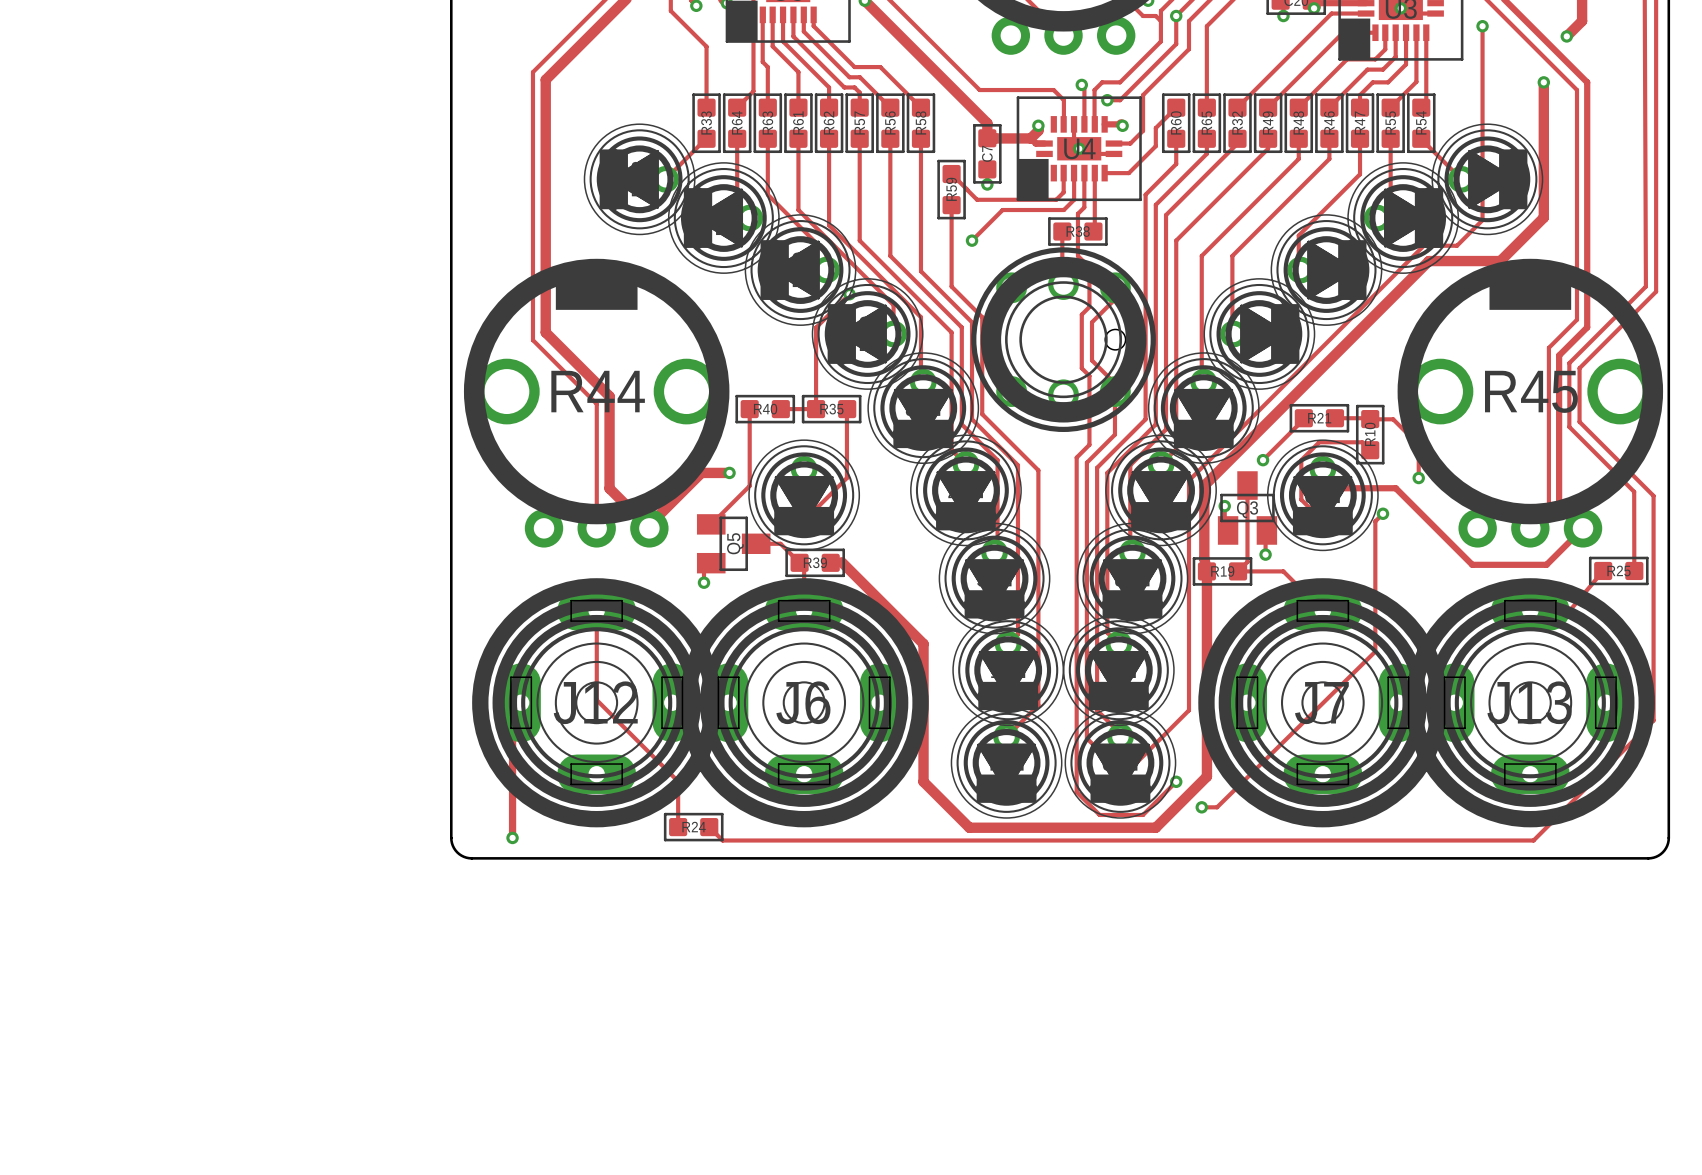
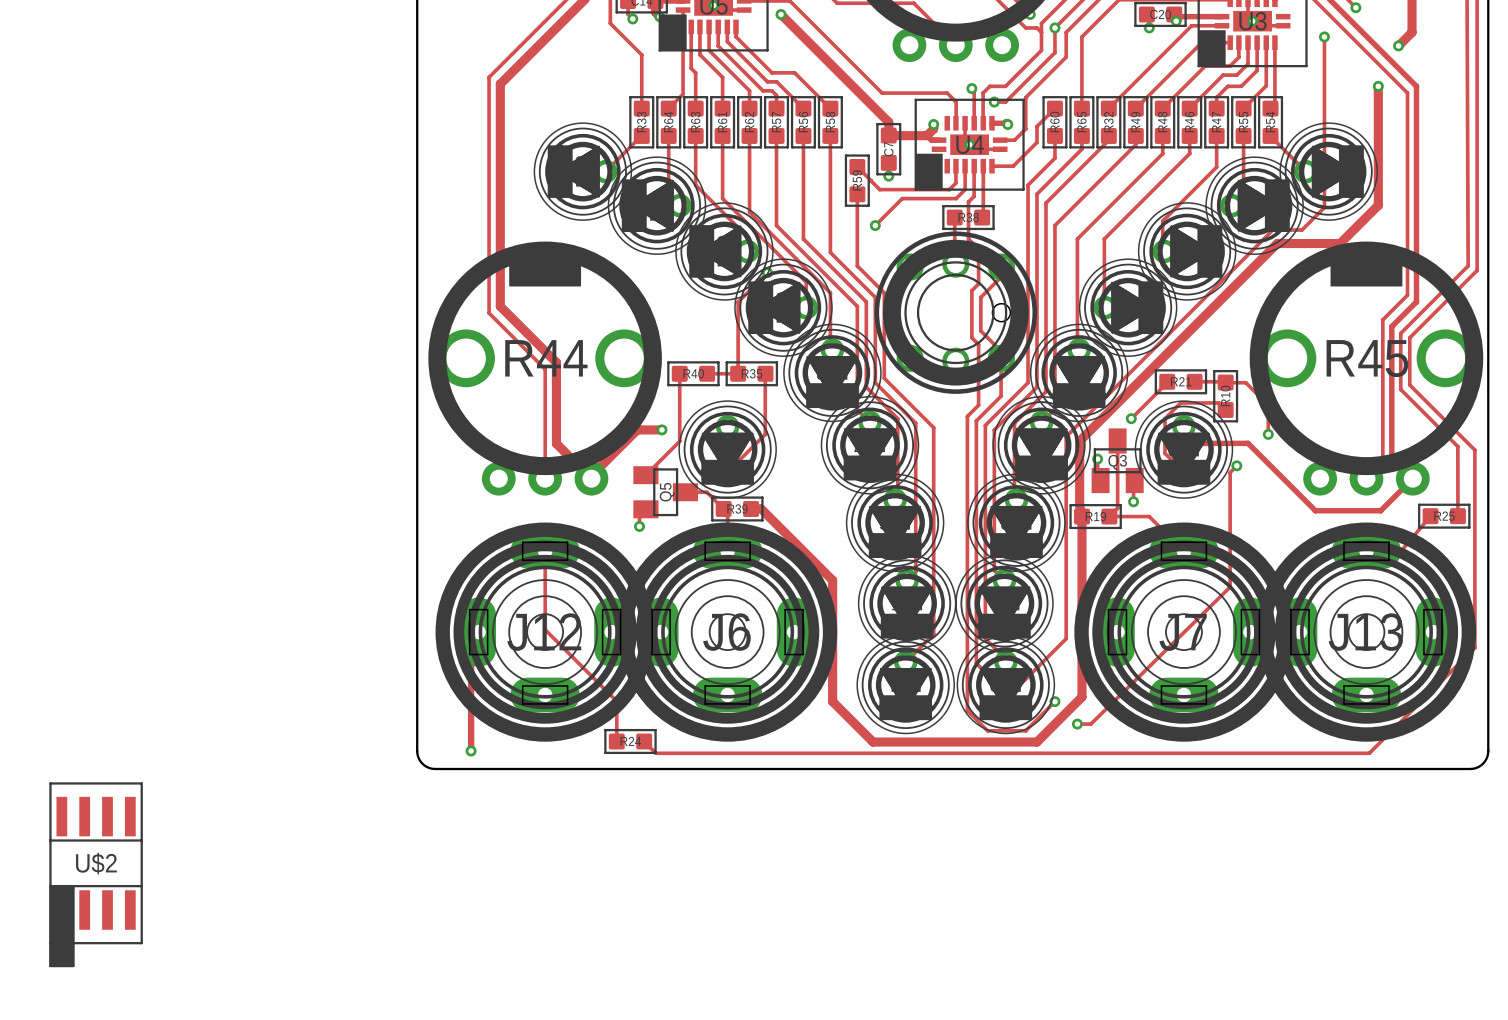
U$2: none -> (96, 874)

